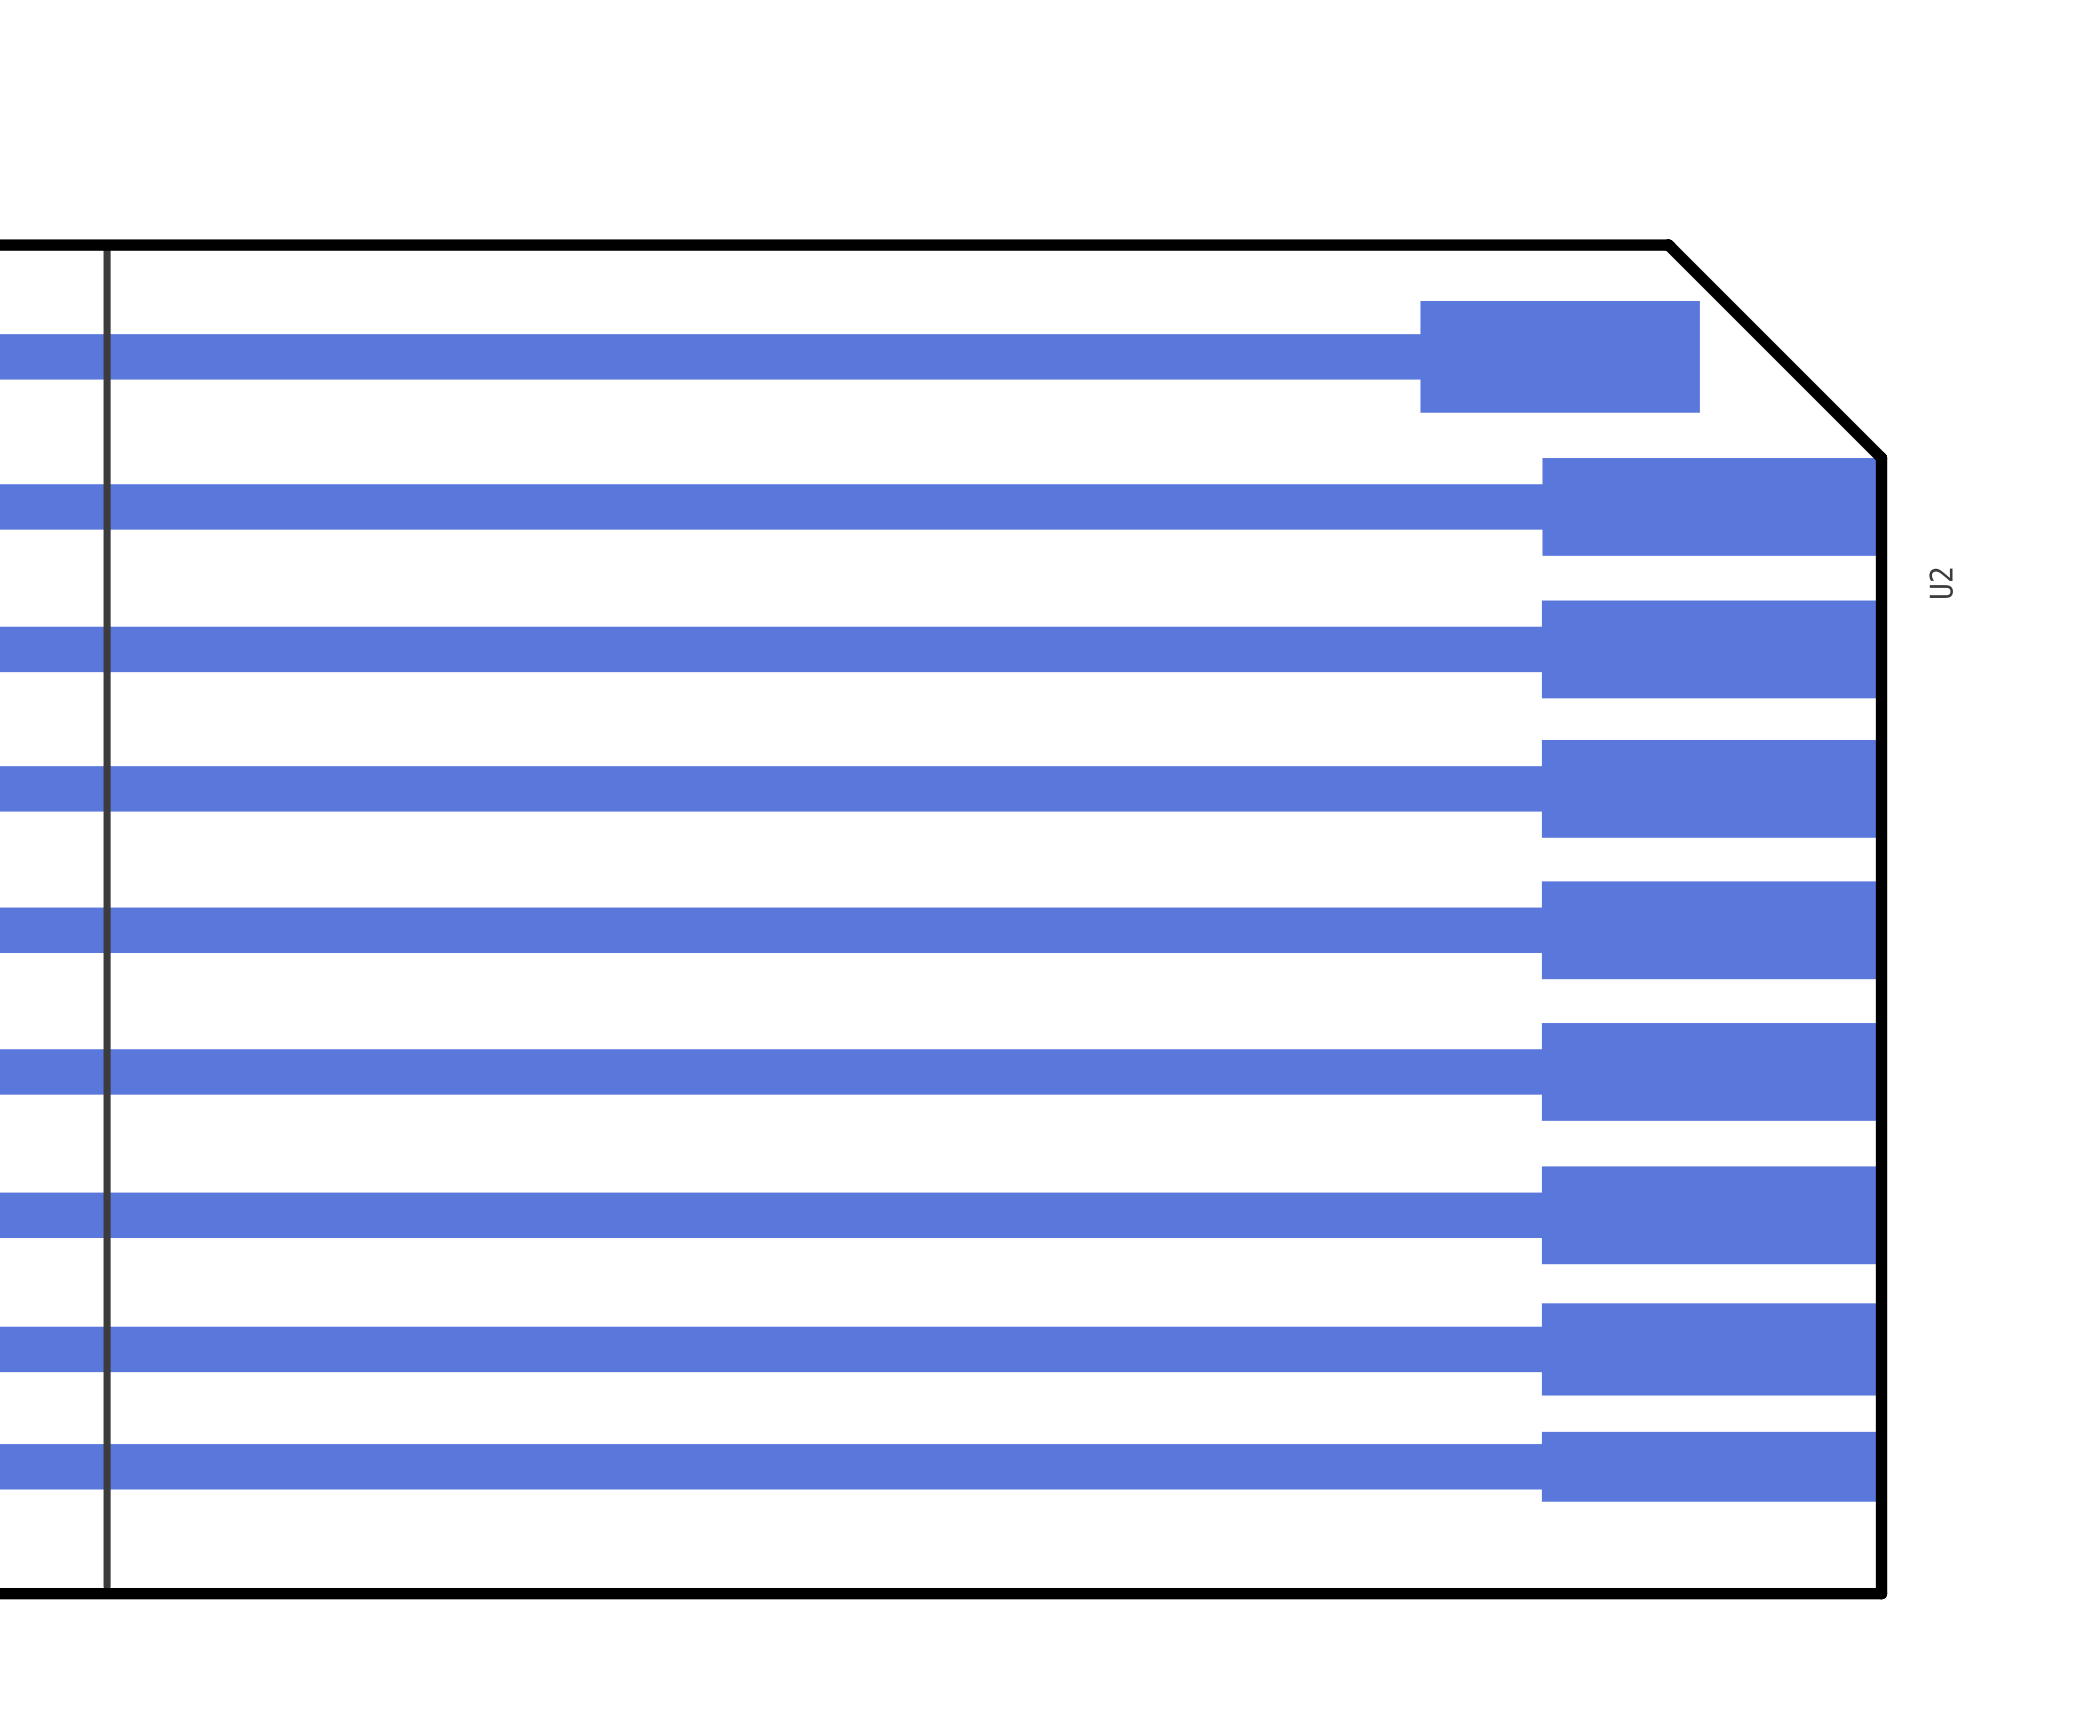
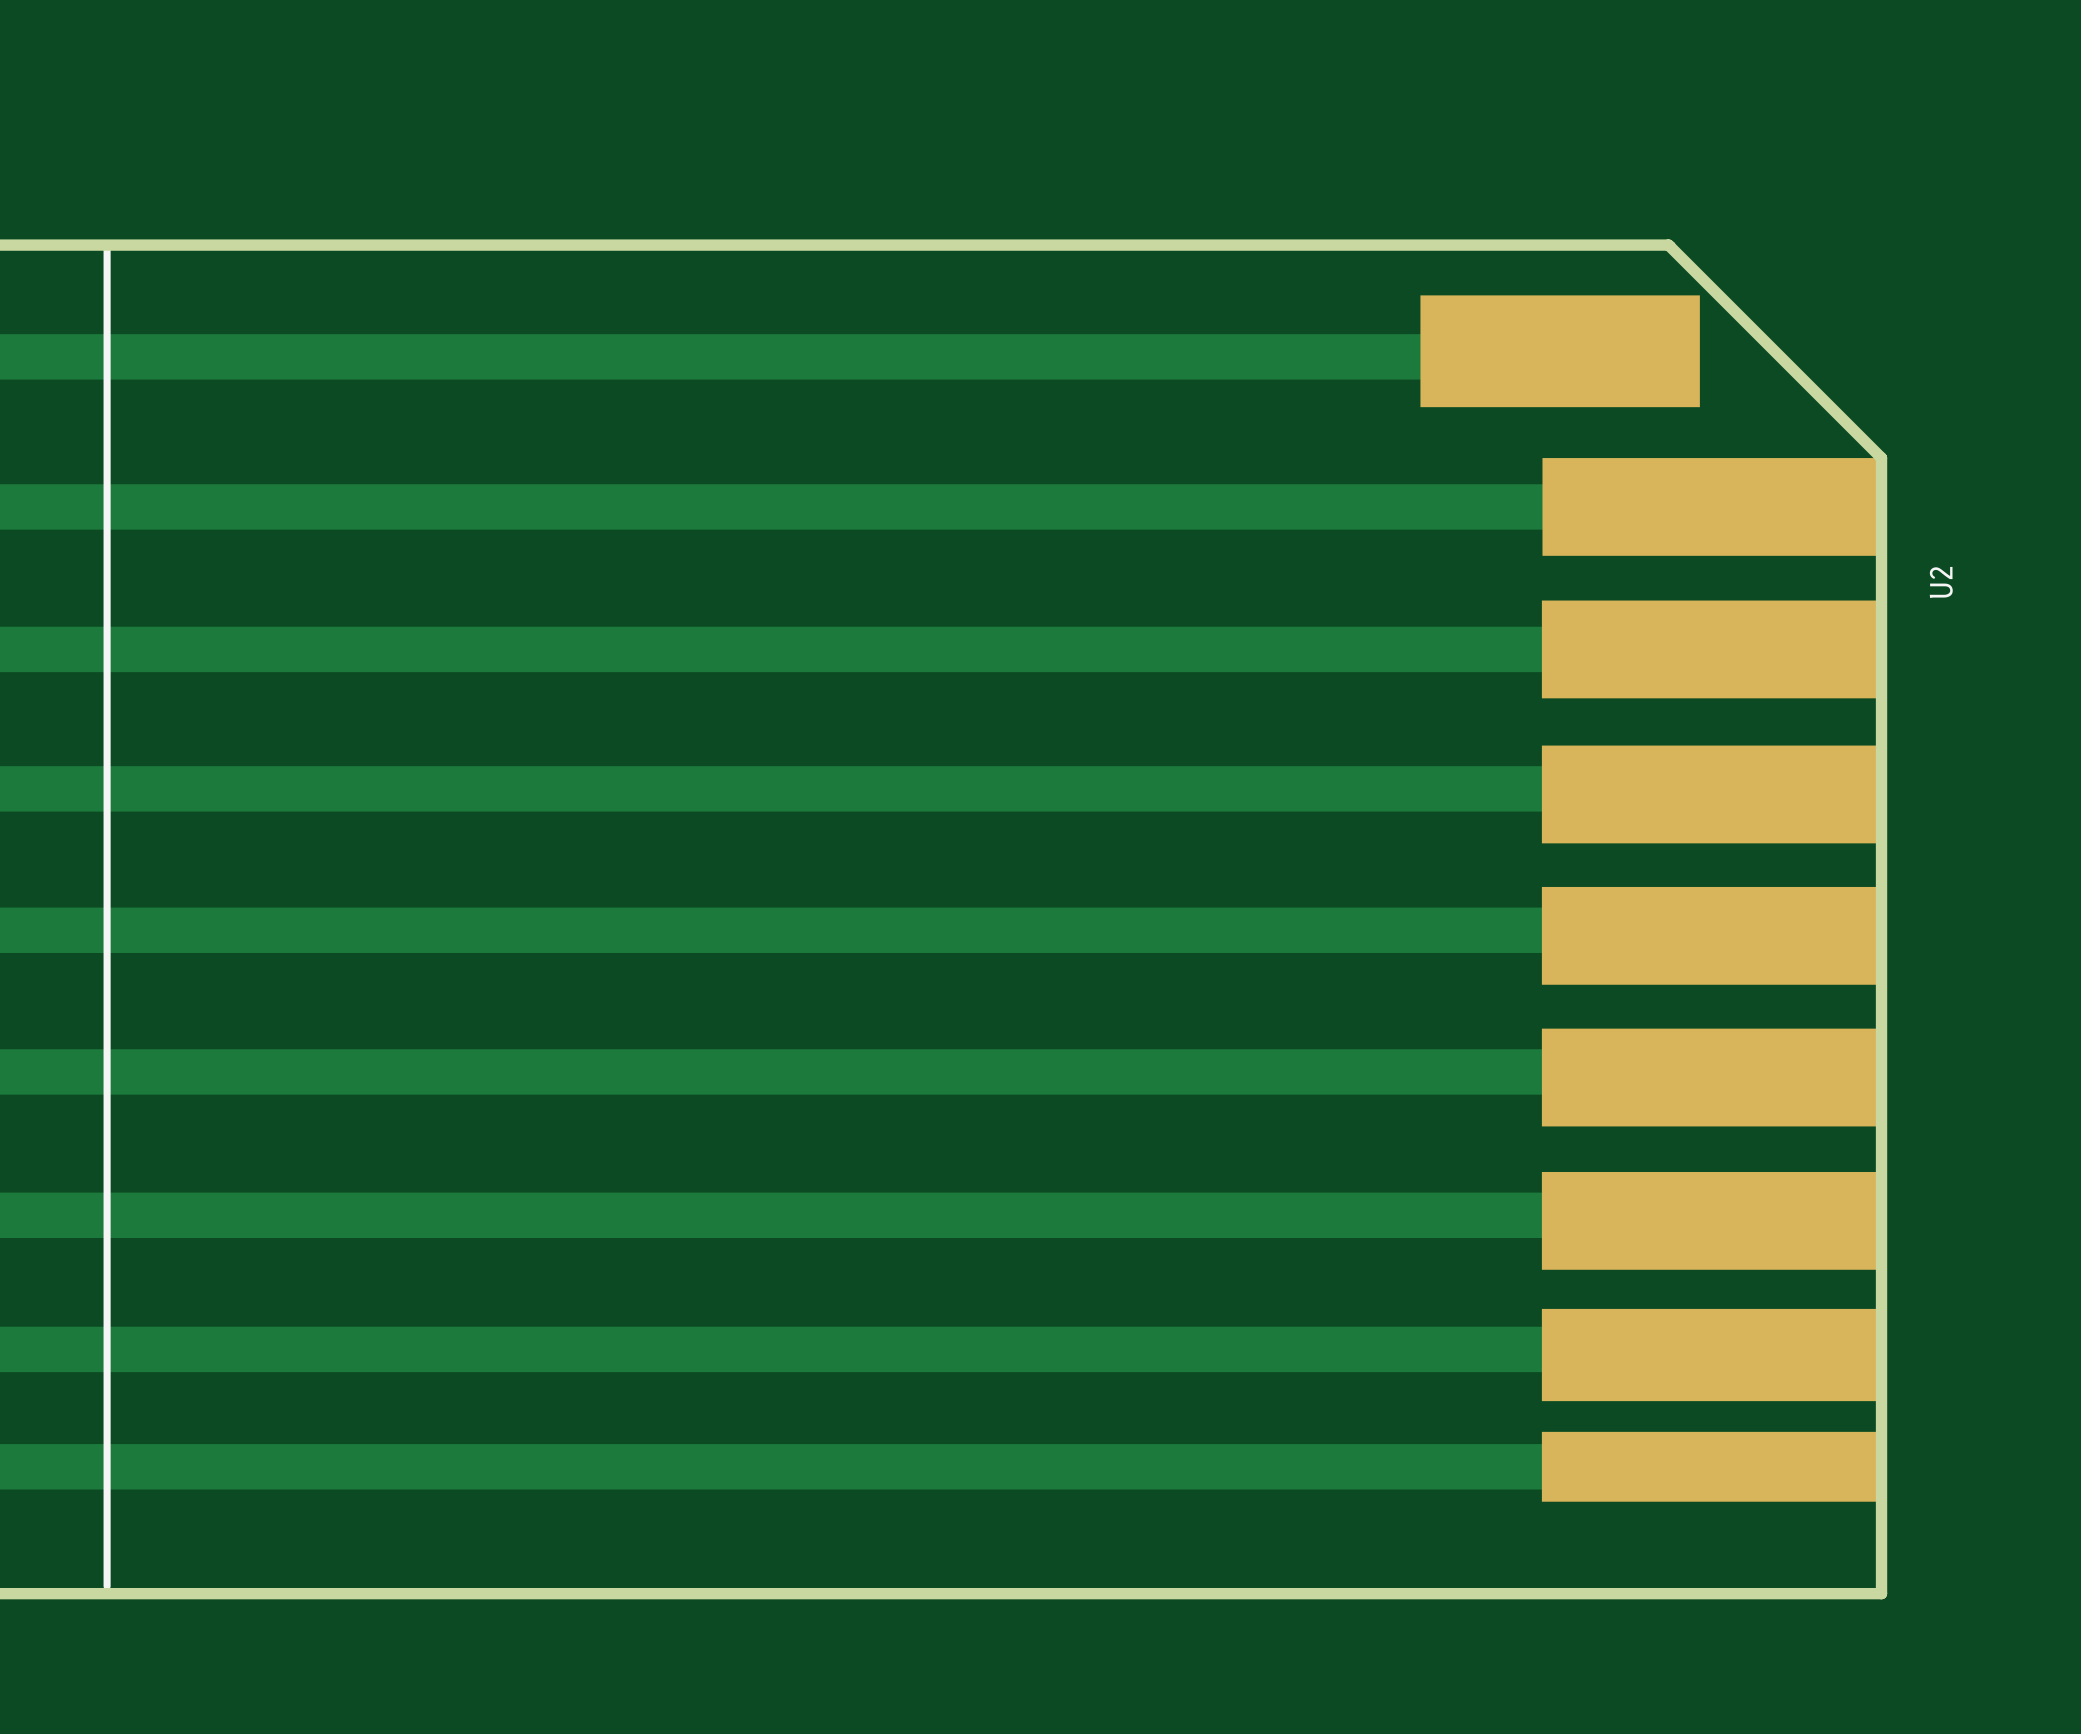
U2 footprint: [103, 241, 1878, 1590] -> [103, 241, 1878, 1590]

